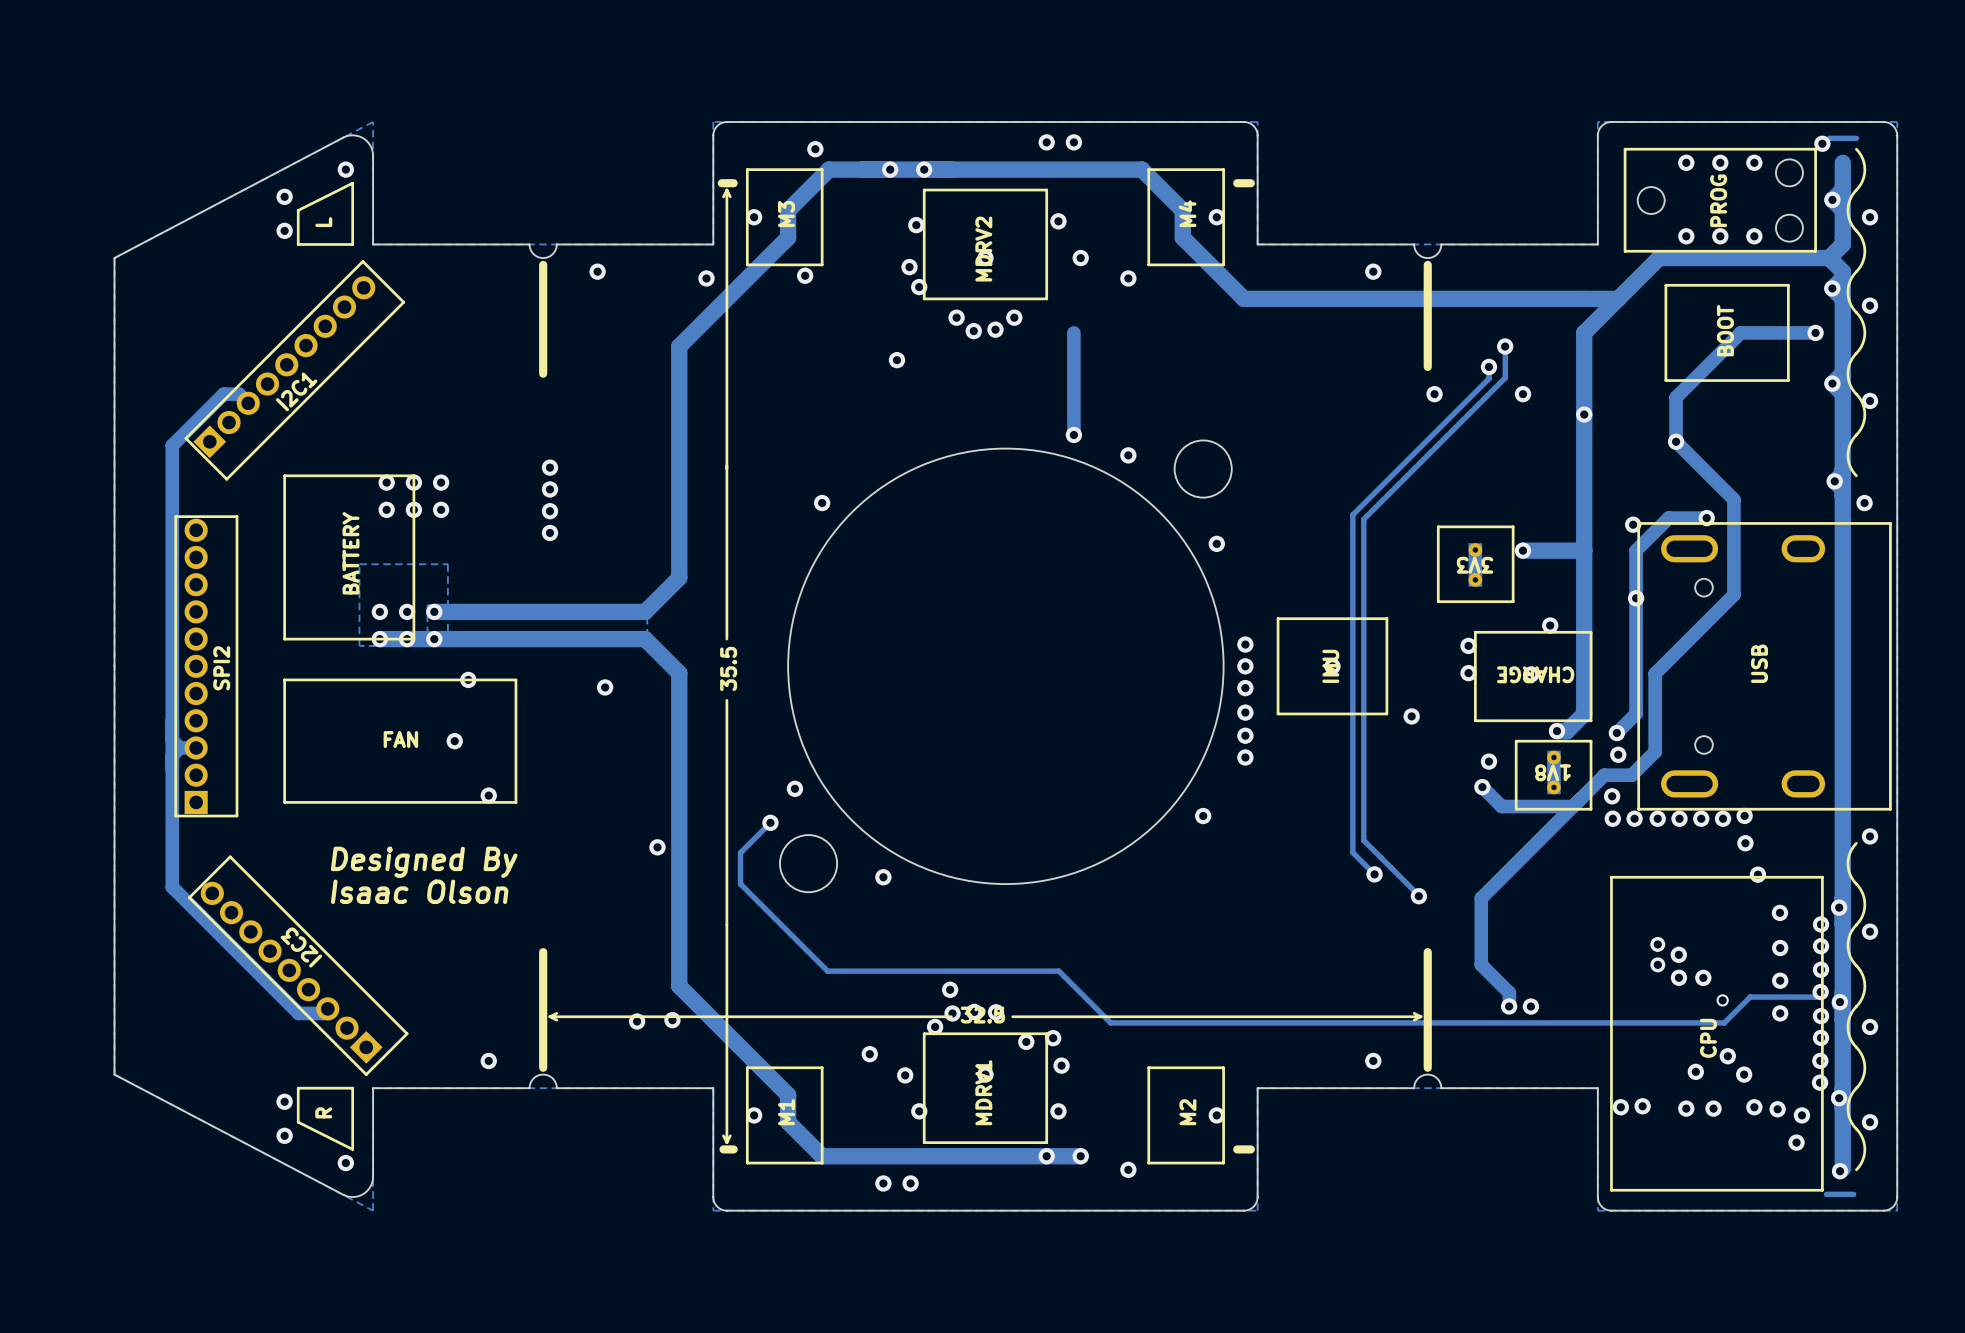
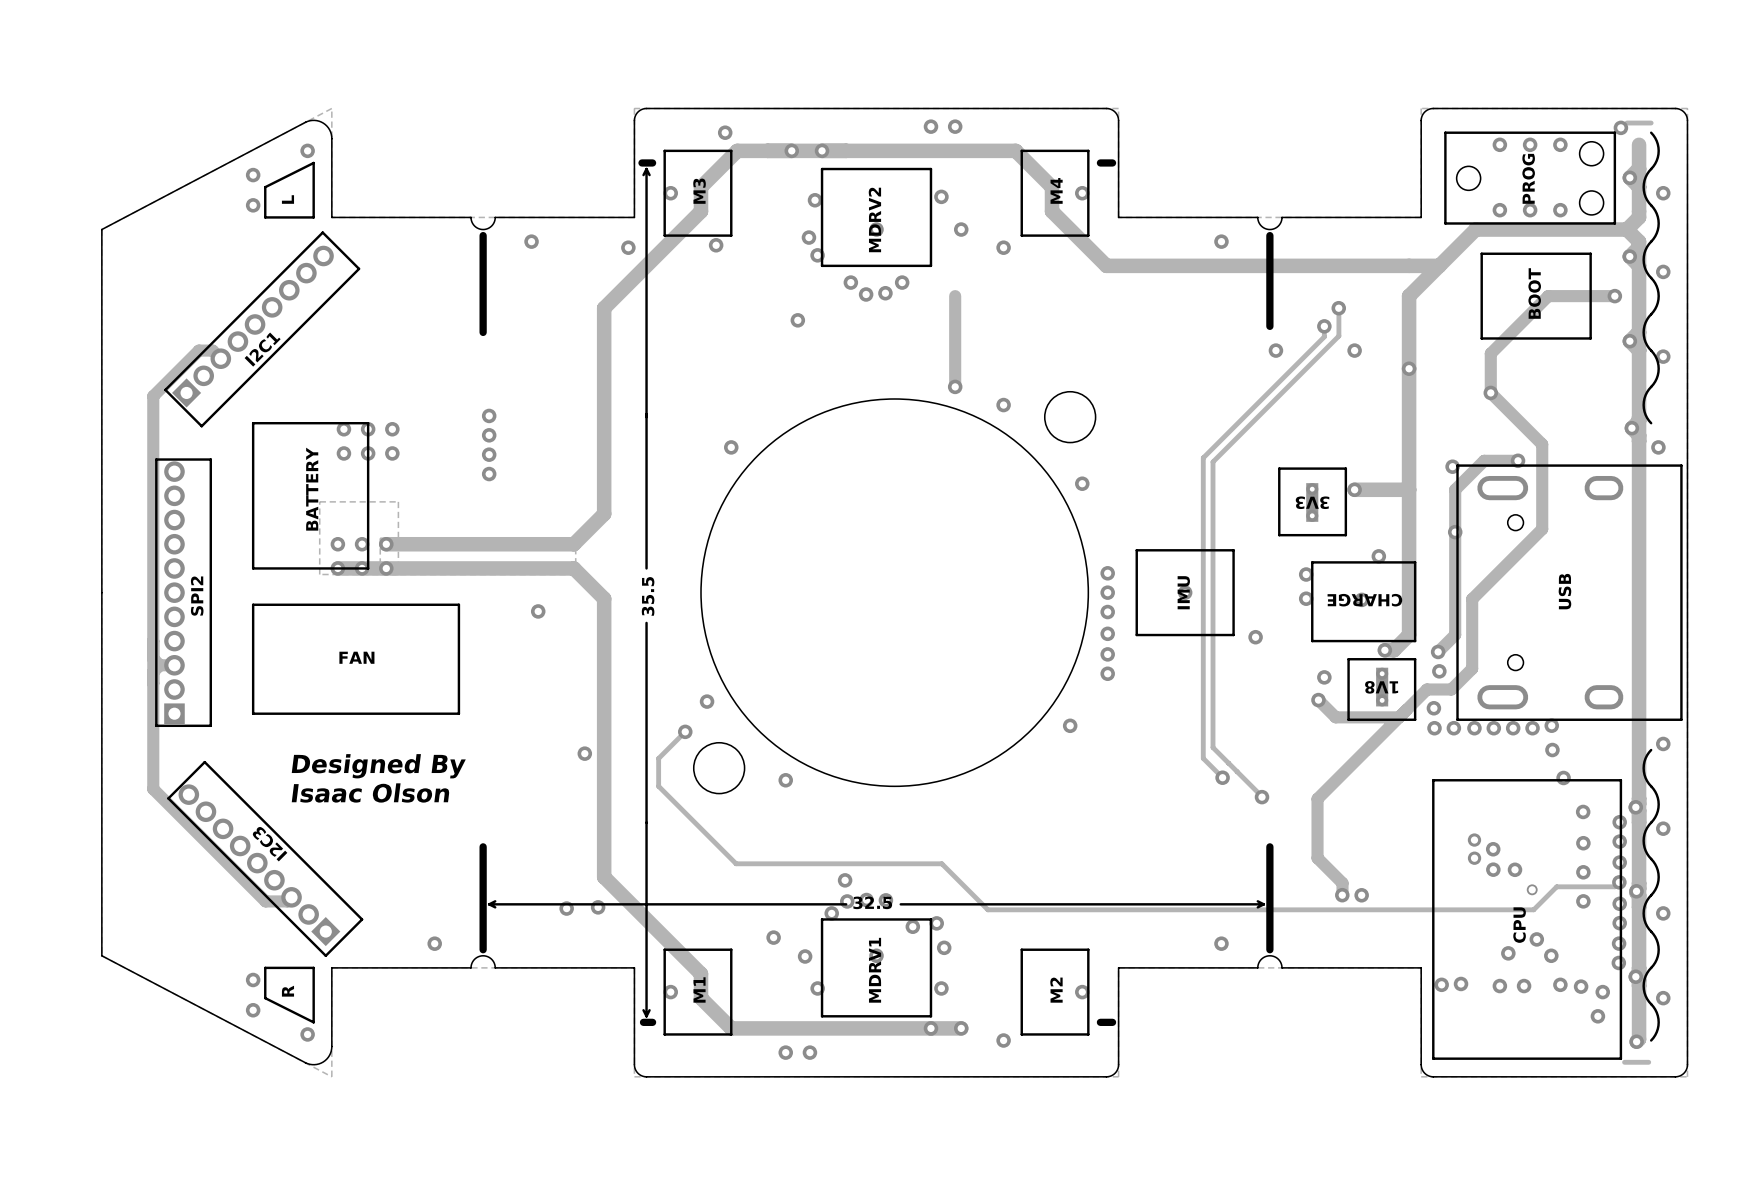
via: (468, 679) -> none
via: (454, 741) -> none
via: (488, 795) -> none

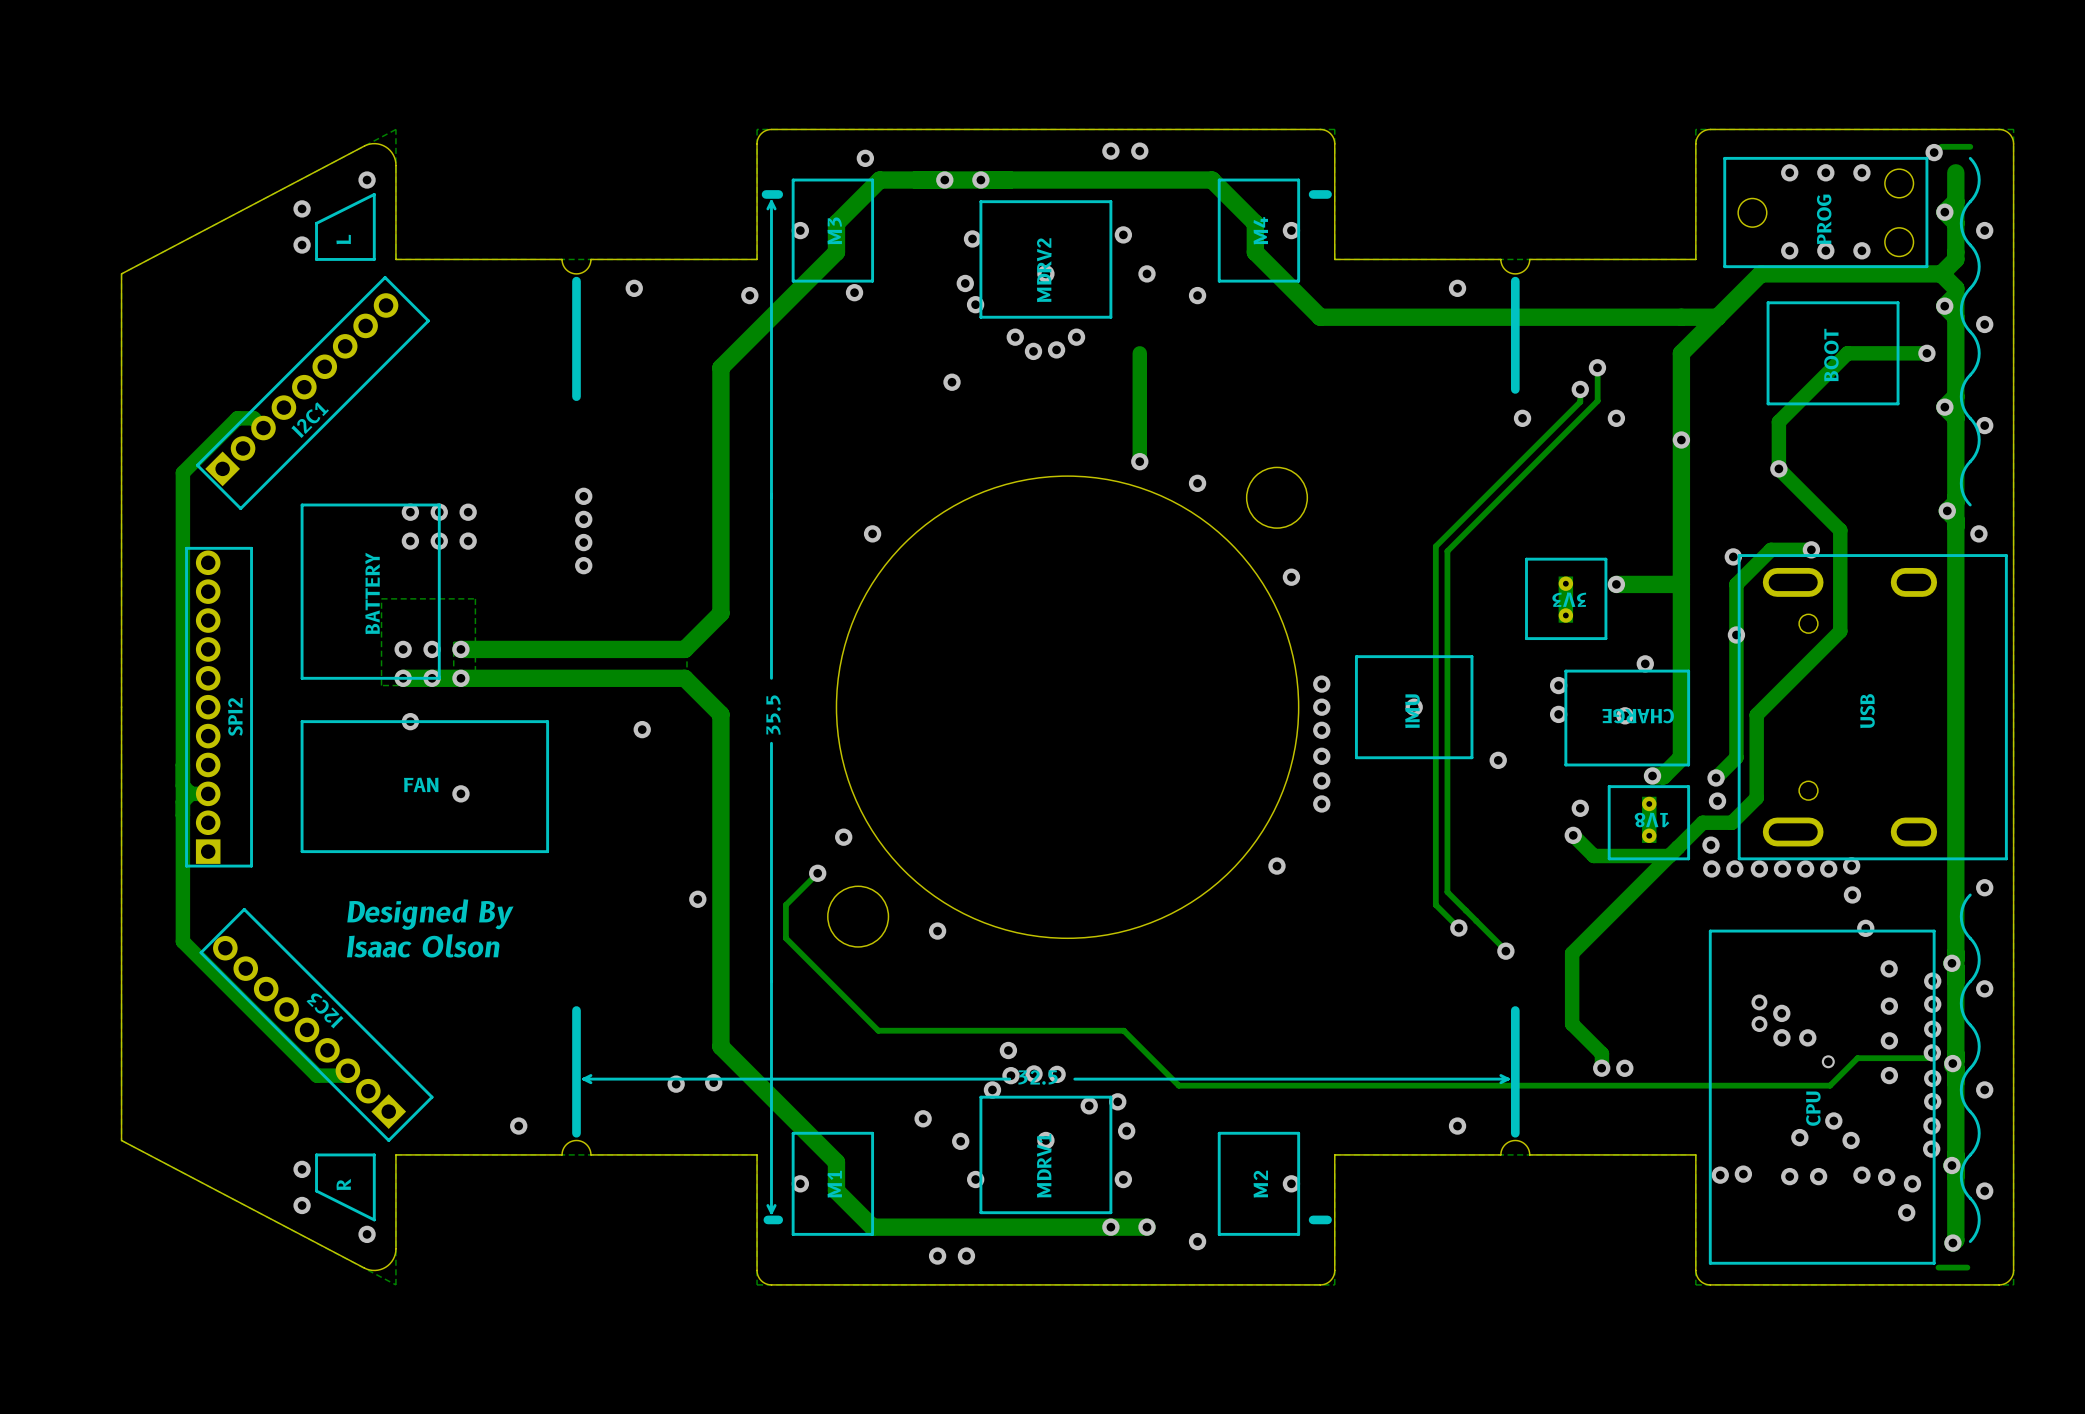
via: none -> (410, 721)
via: none -> (460, 793)

